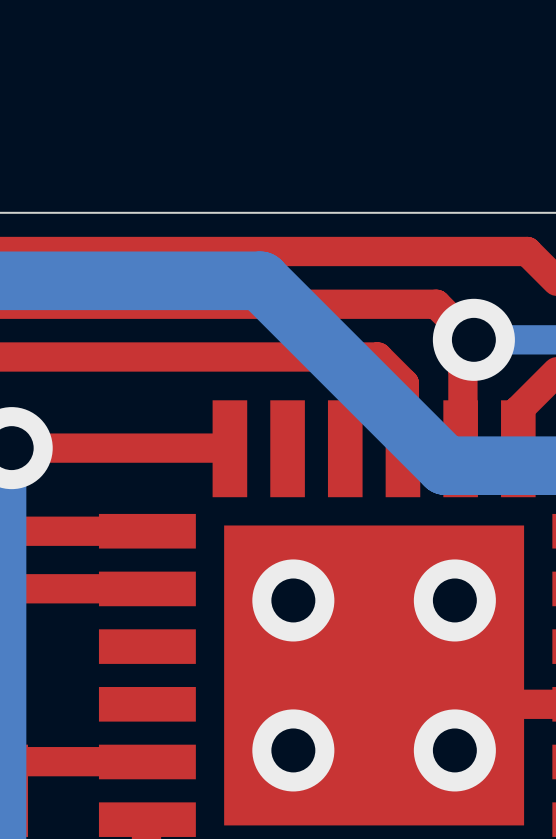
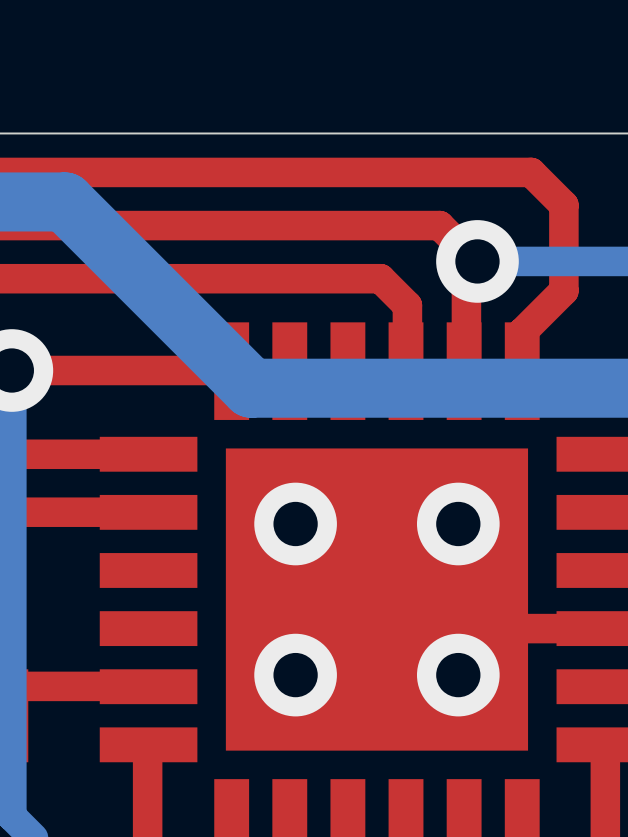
bottom track: (64, 280) (260, 280) (445, 465) -> (64, 201) (251, 388) (448, 388)

